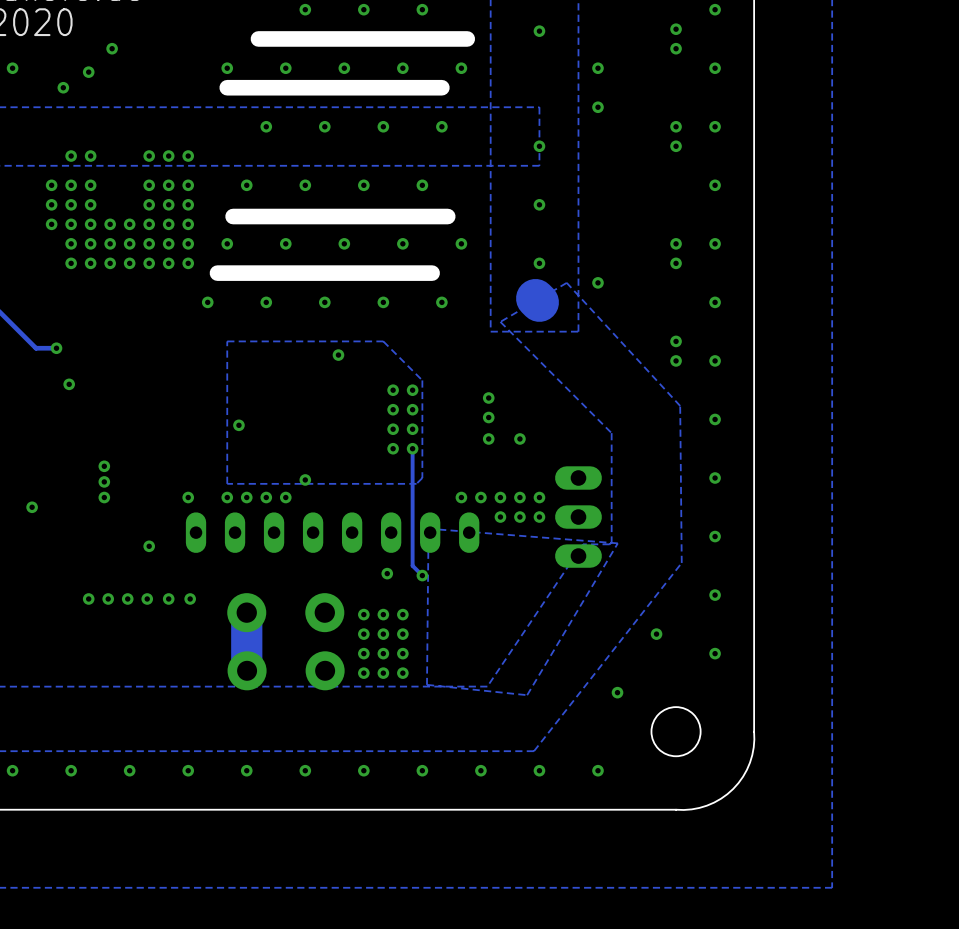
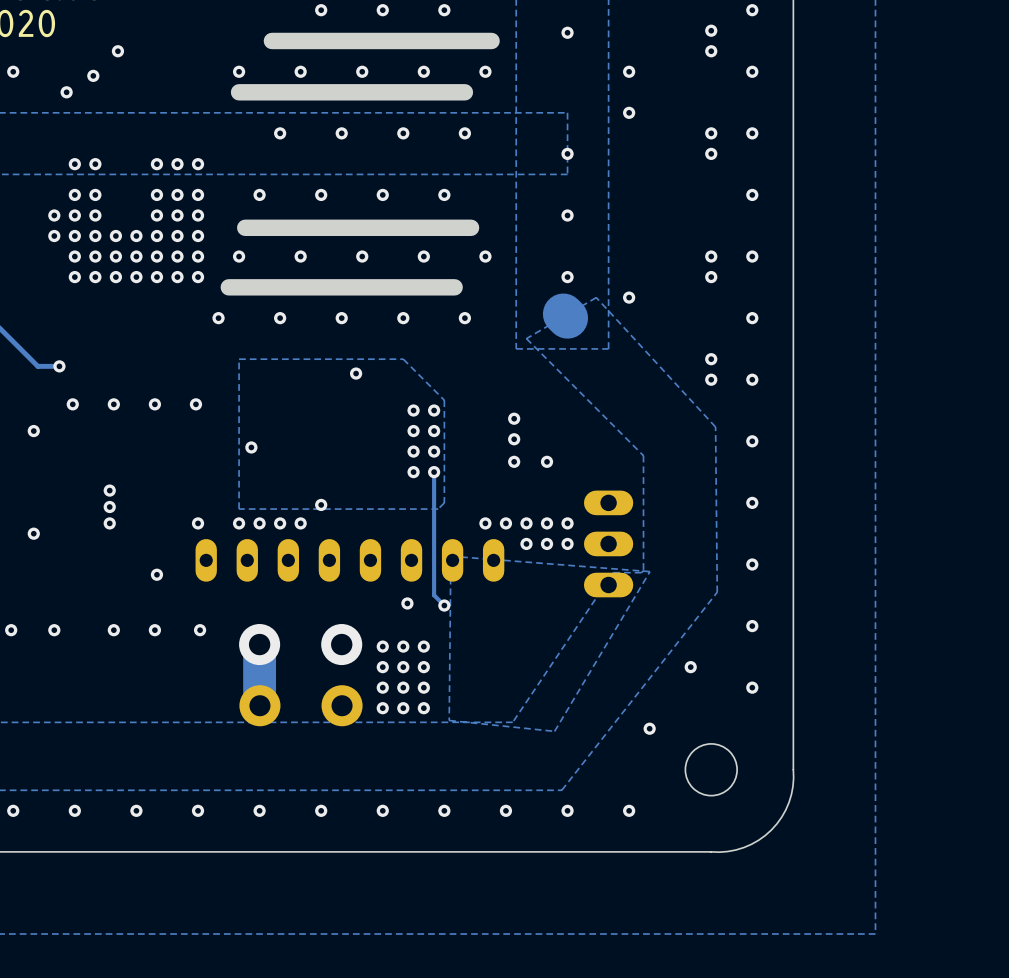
via: (51, 185) -> none
via: none -> (113, 404)
via: none -> (154, 404)
via: none -> (195, 404)
via: none -> (33, 431)
via: none -> (11, 630)
via position: (88, 598) -> (54, 630)
via: (127, 598) -> none
via: (168, 598) -> none

